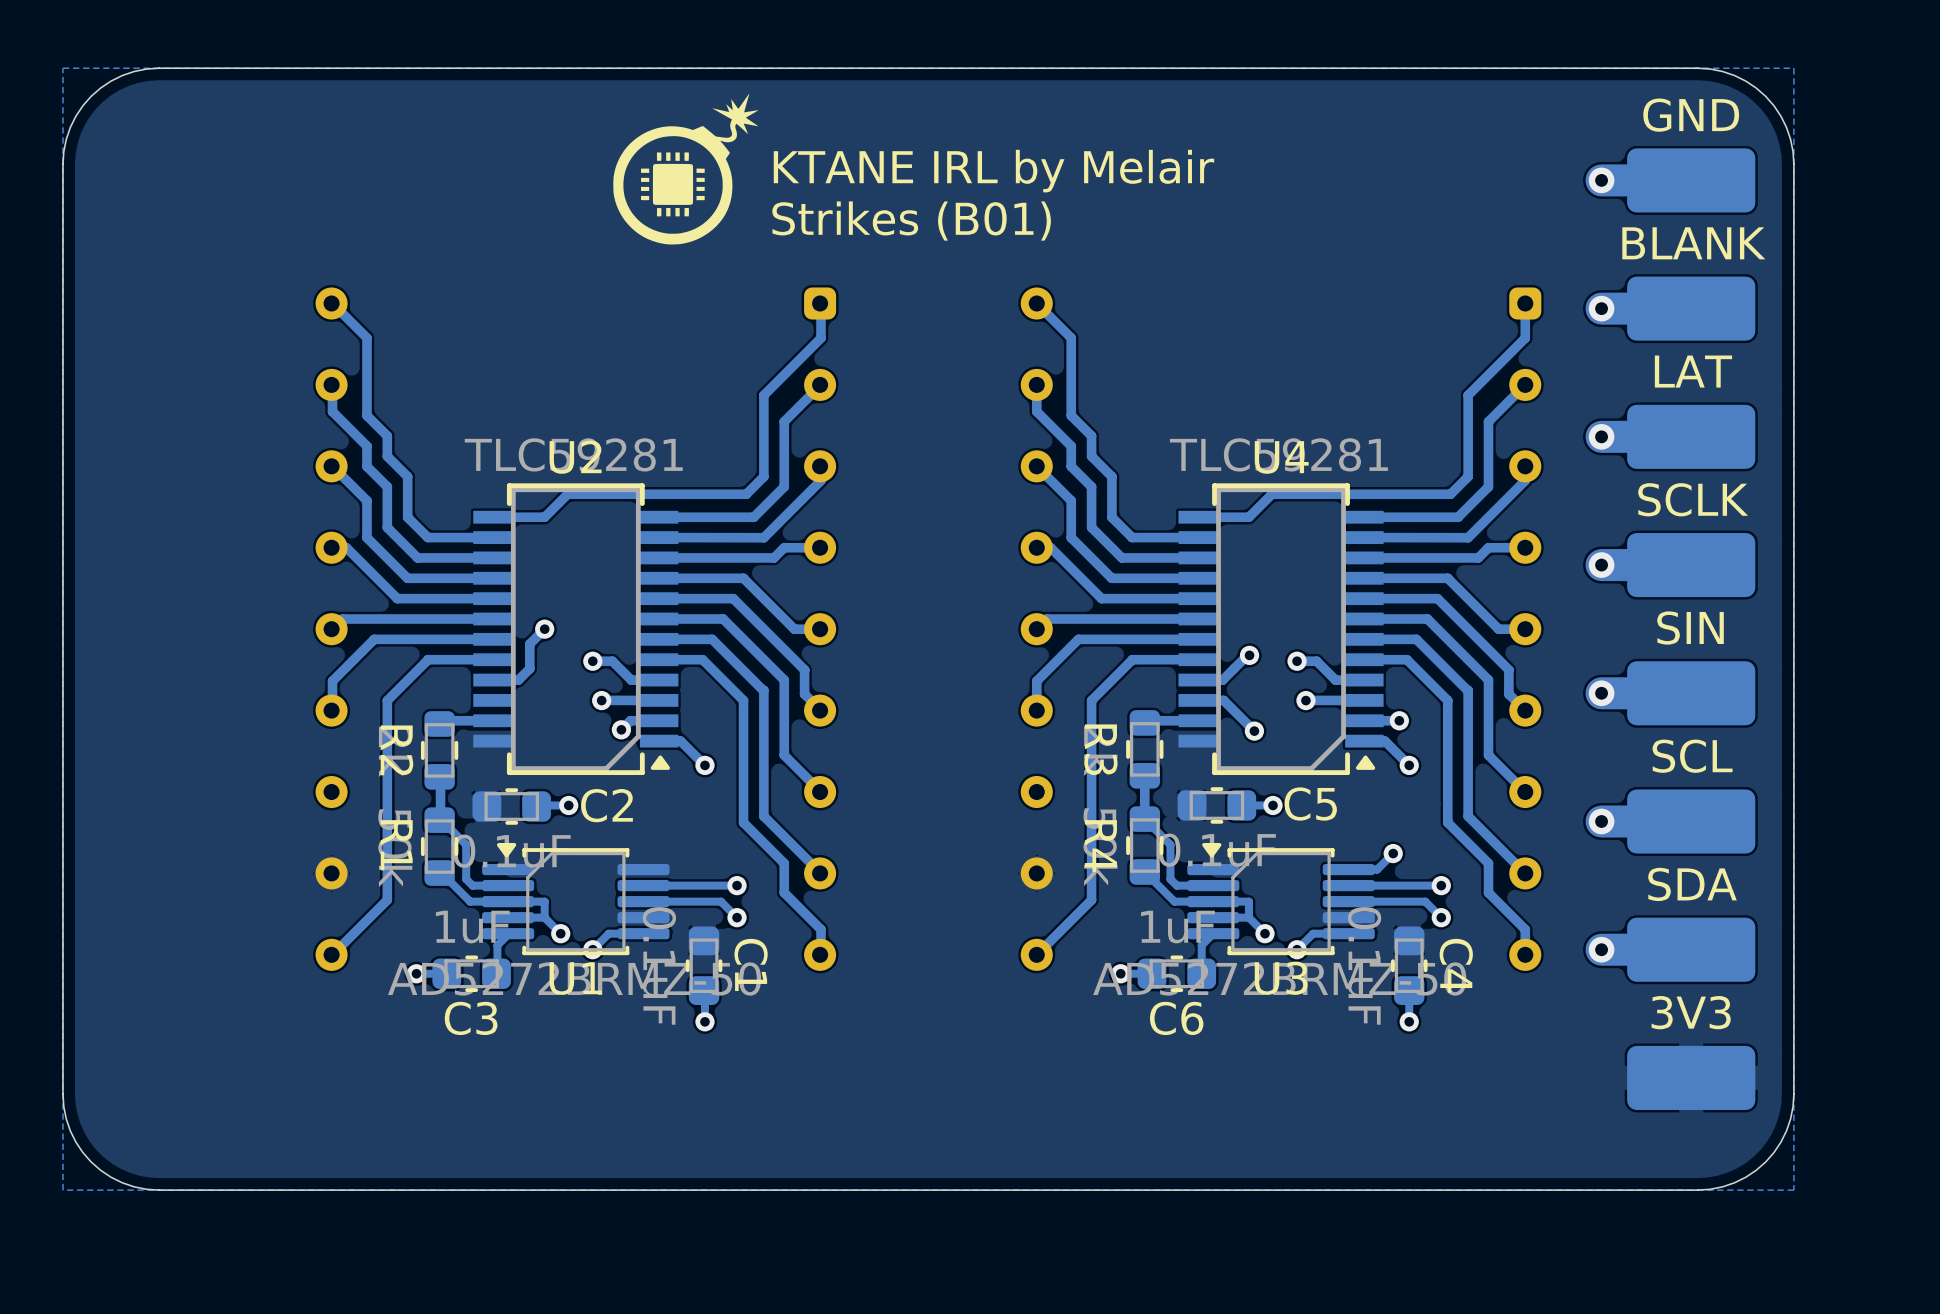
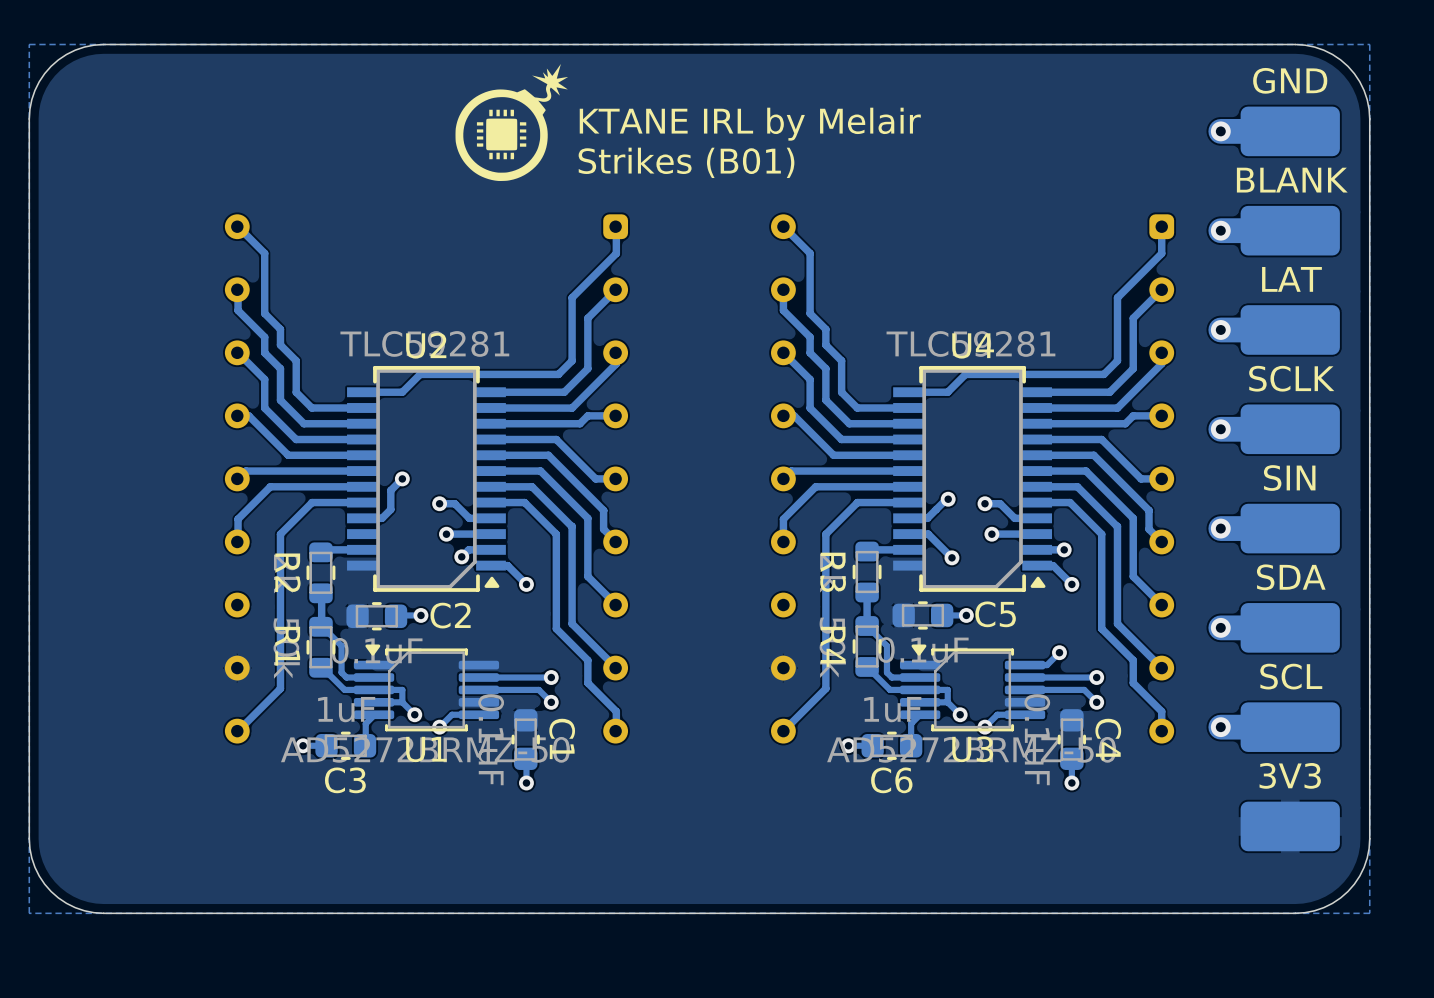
part value: SCL (1692, 756) -> SDA (1291, 577)
part value: SDA (1692, 884) -> SCL (1291, 676)

